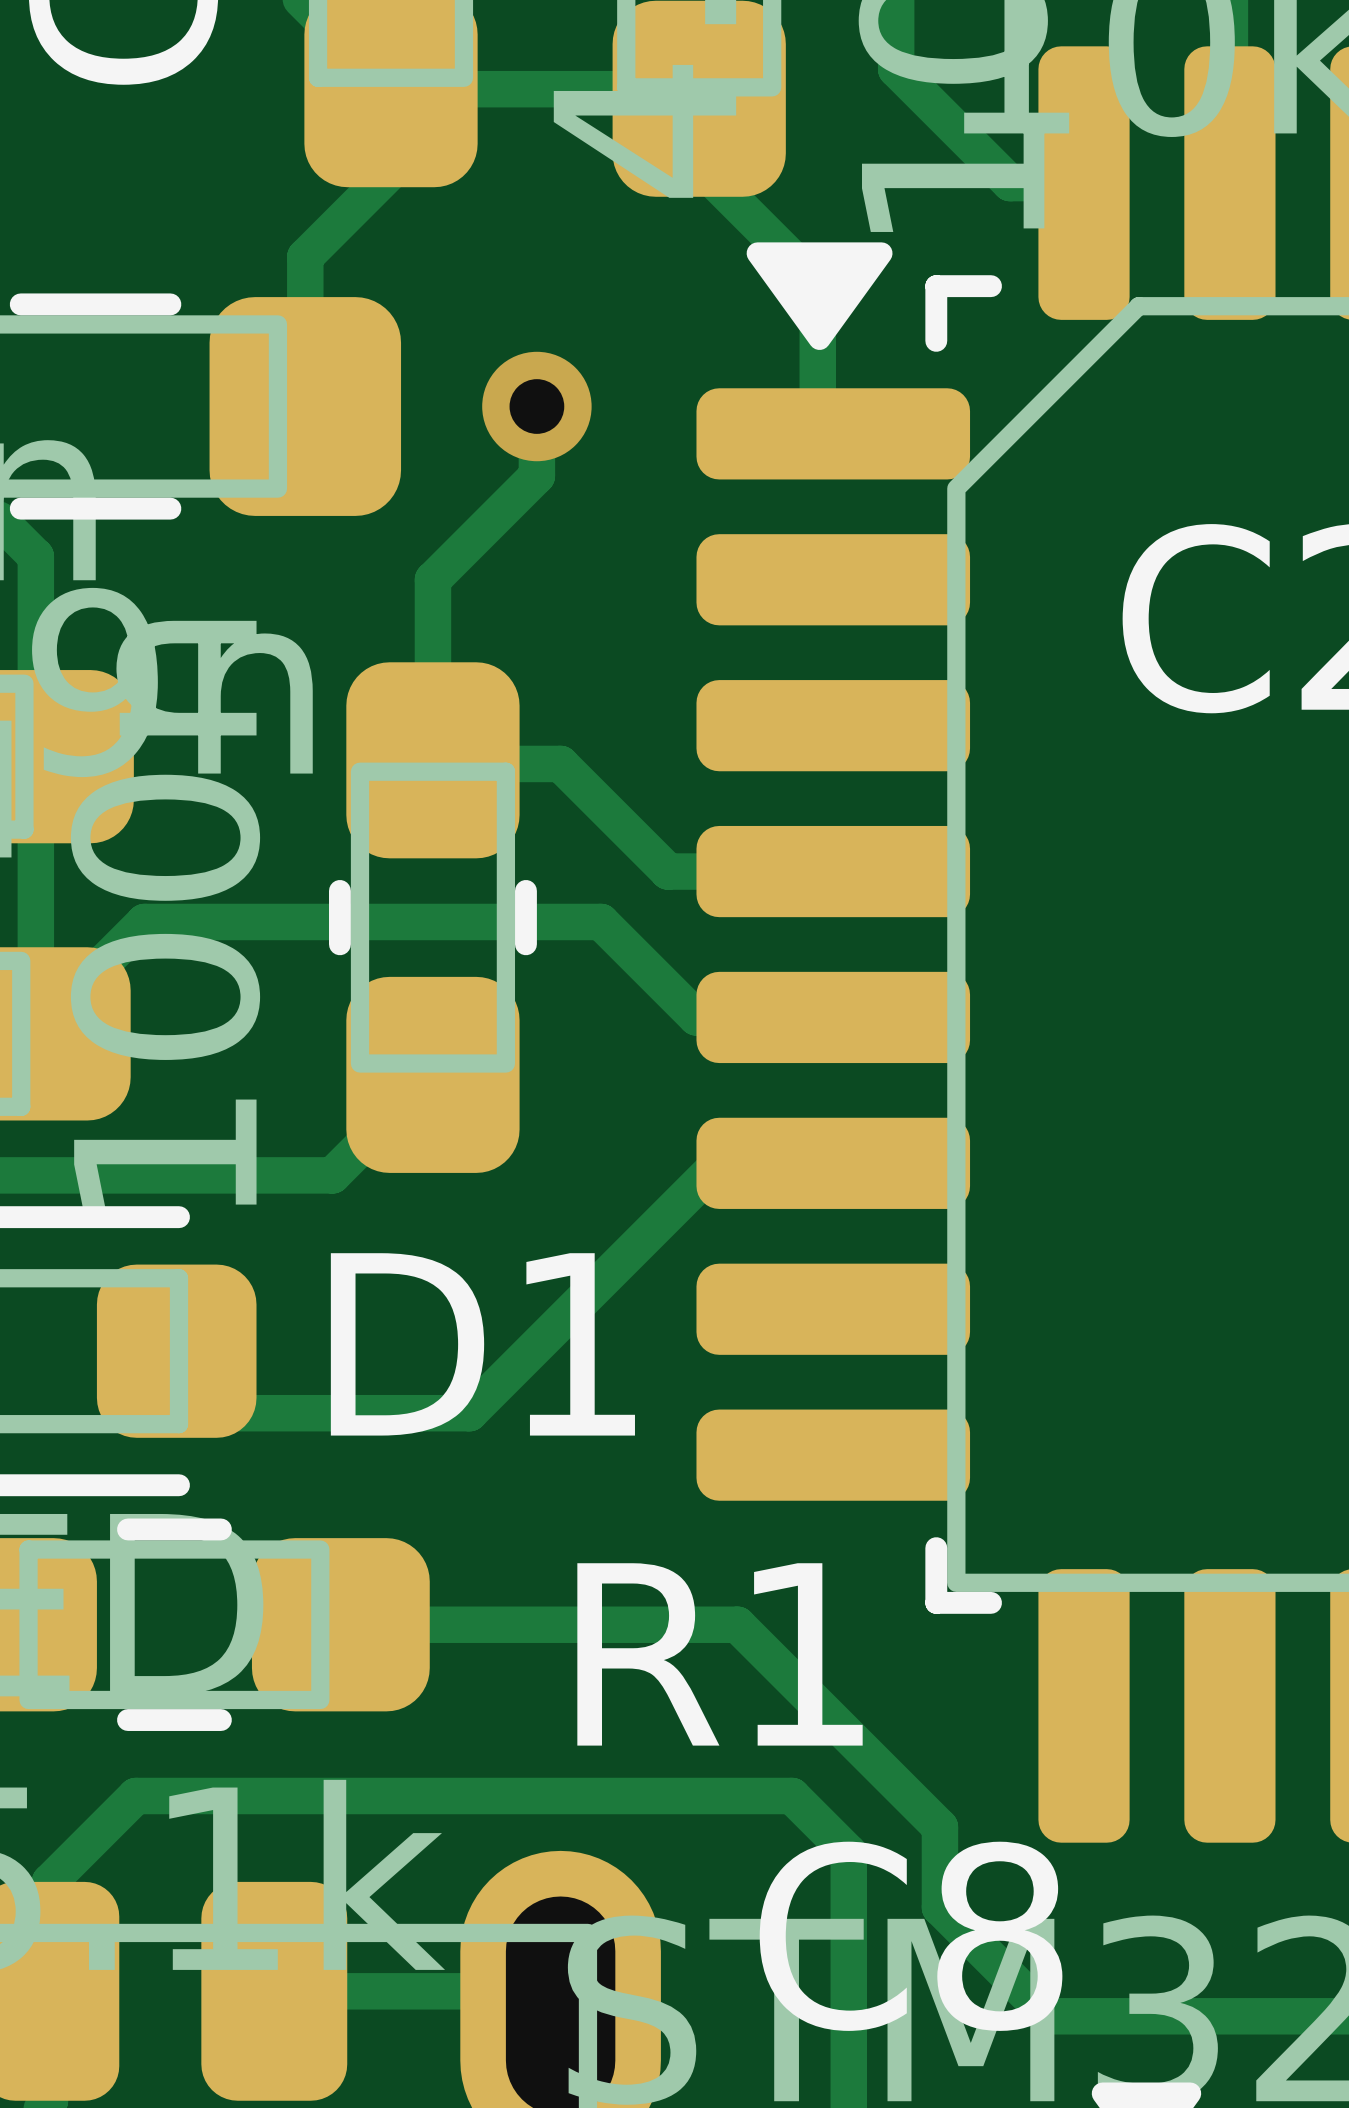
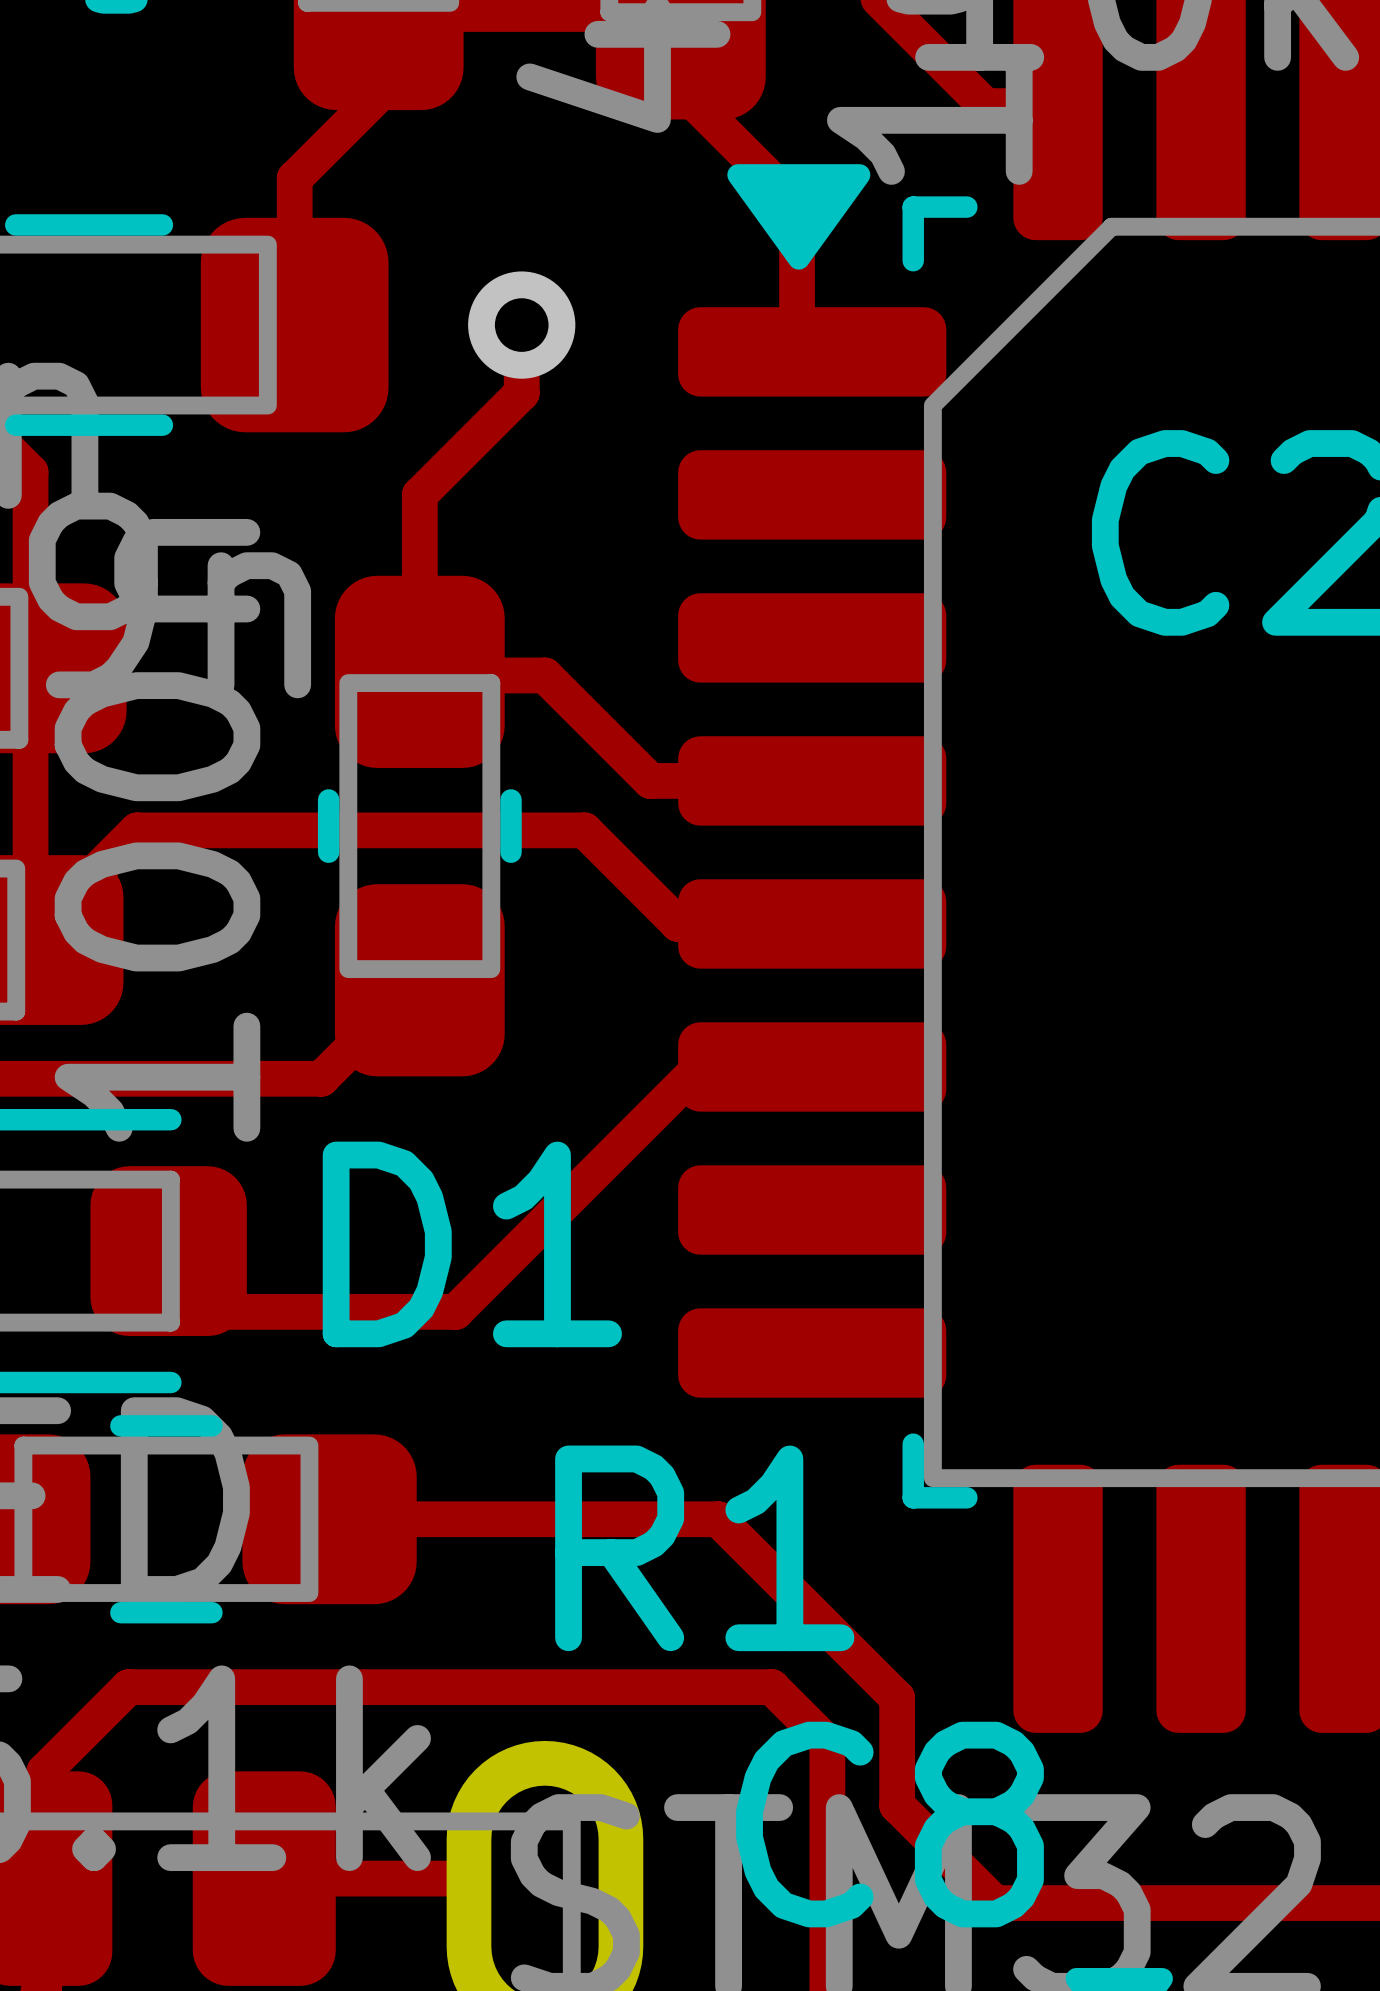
track: (919, 1807) (939, 1827) (939, 1907) (1048, 2016) -> (897, 1698) (897, 1805) (994, 1903) (1023, 1903)

